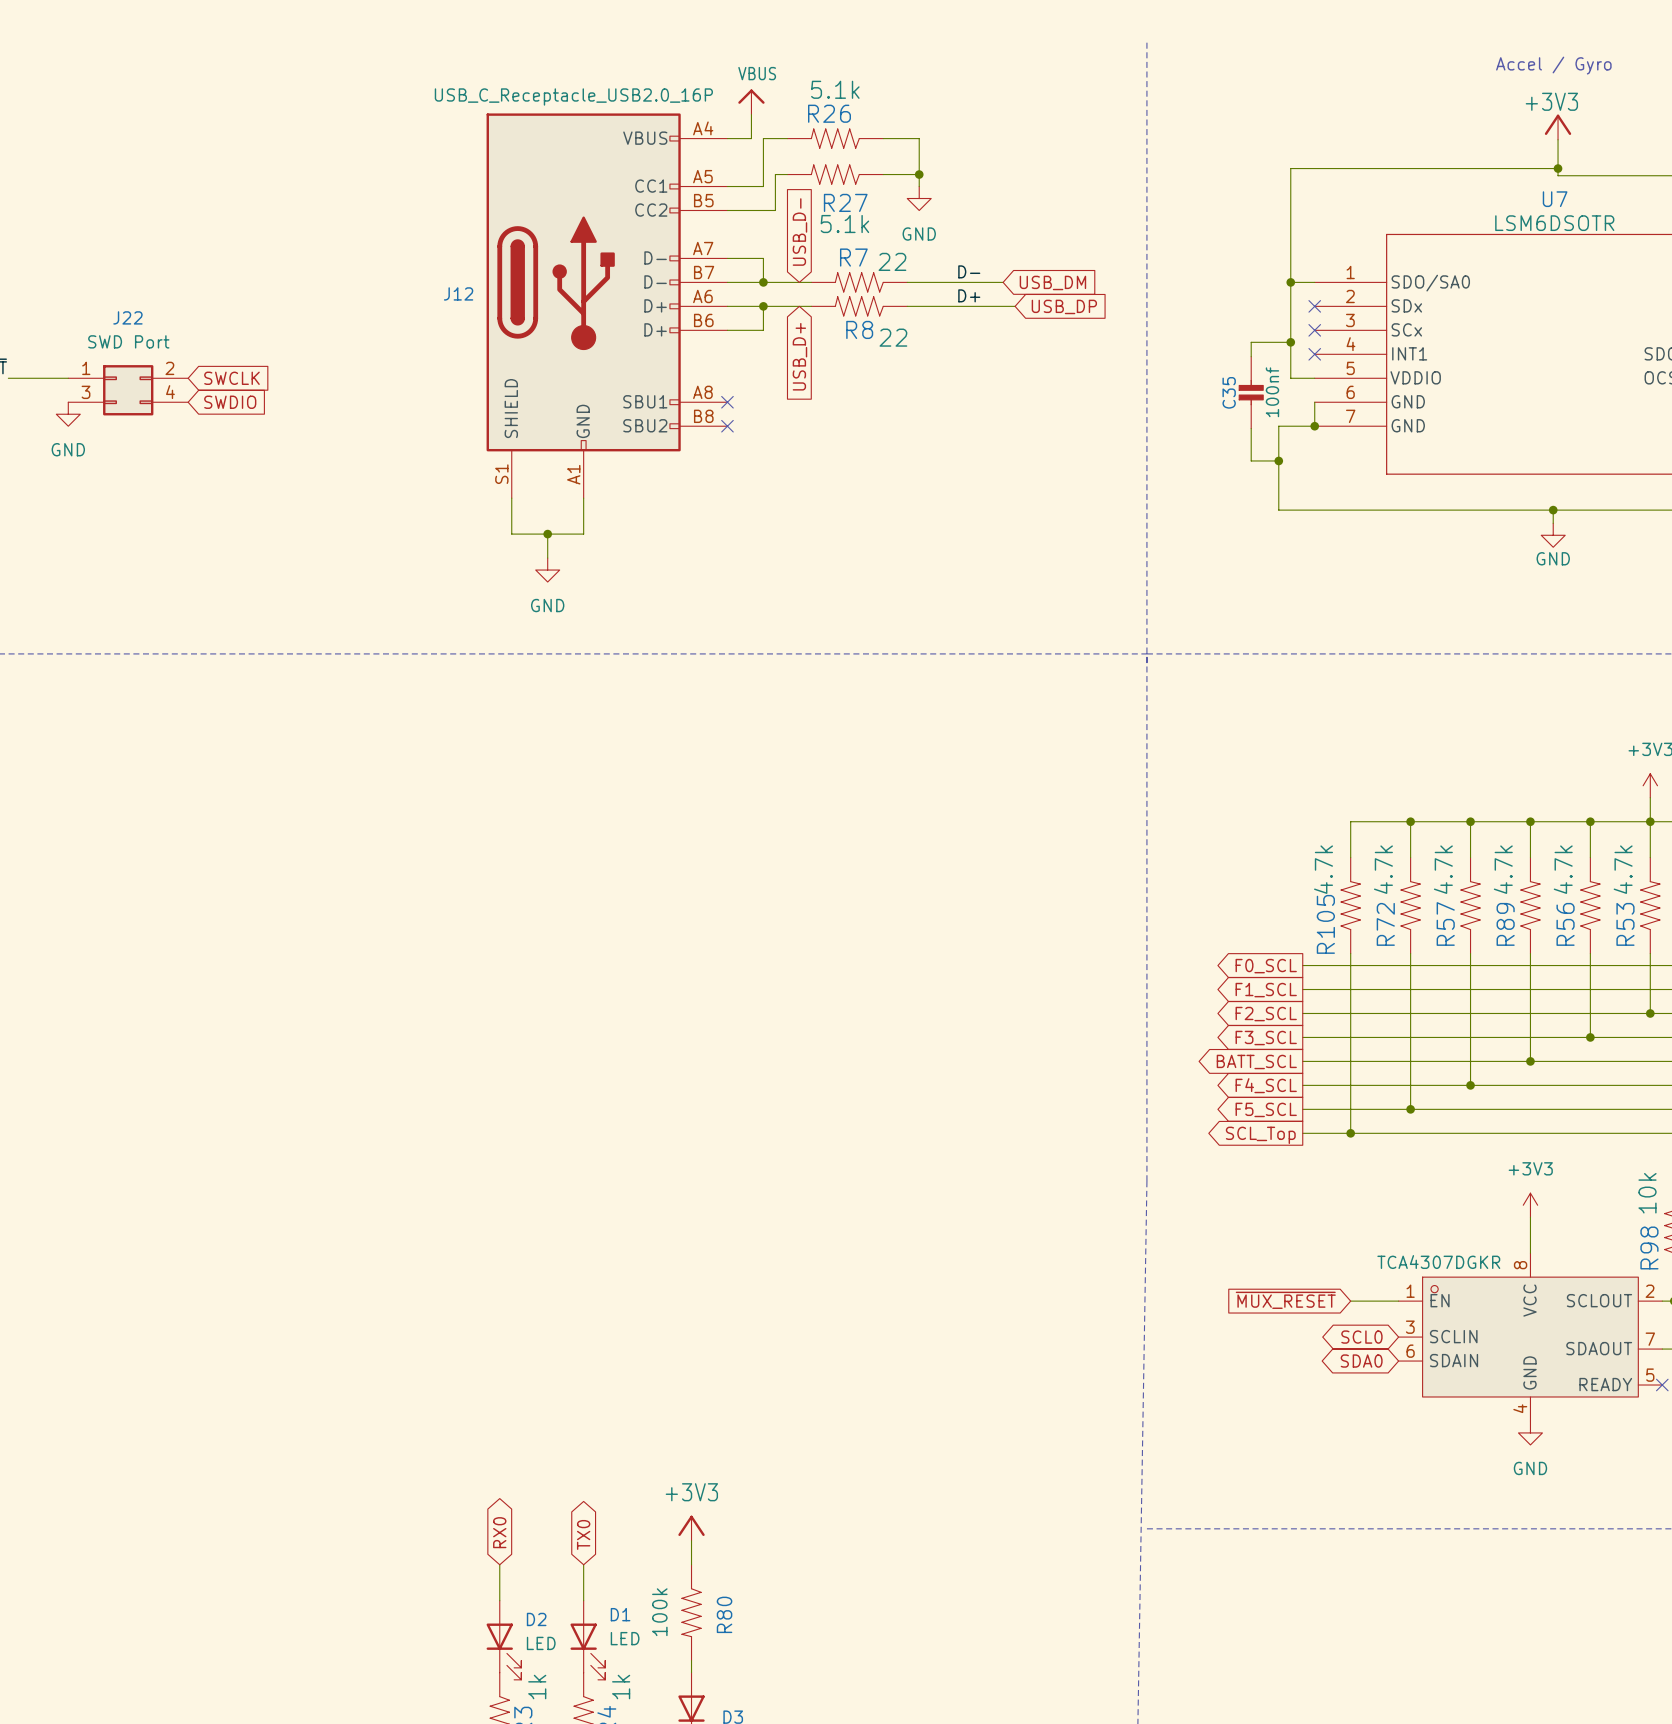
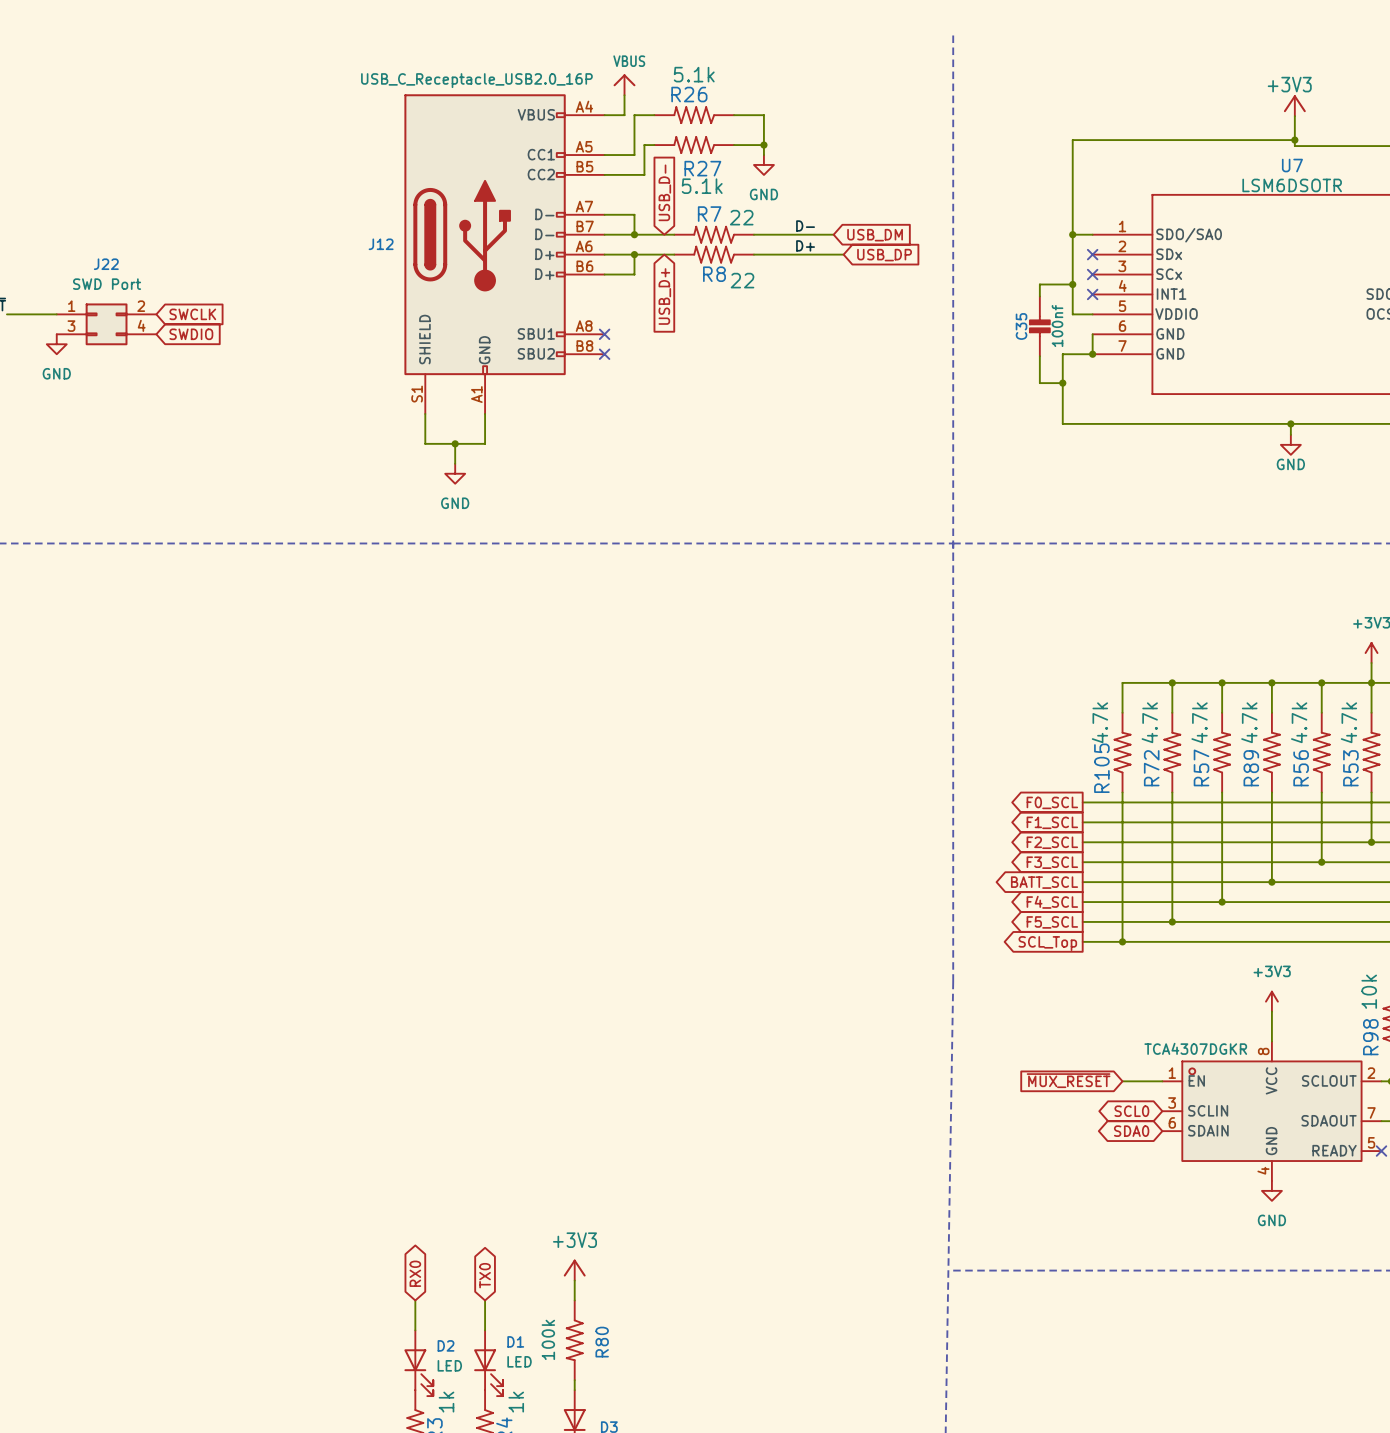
text: Accel / Gyro (1553, 65) -> none

